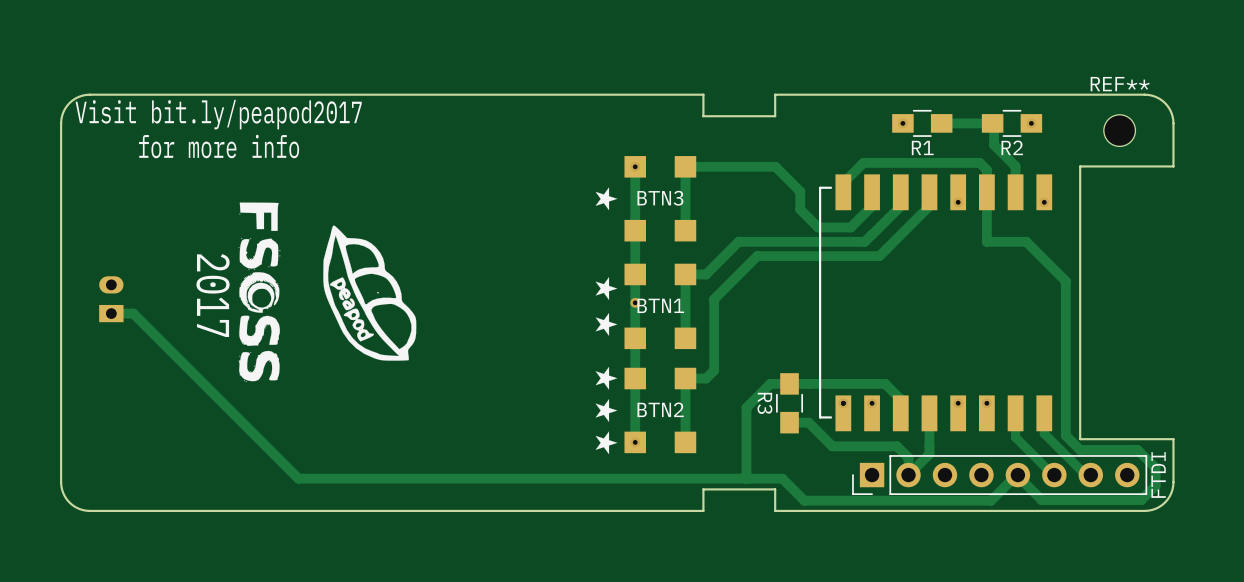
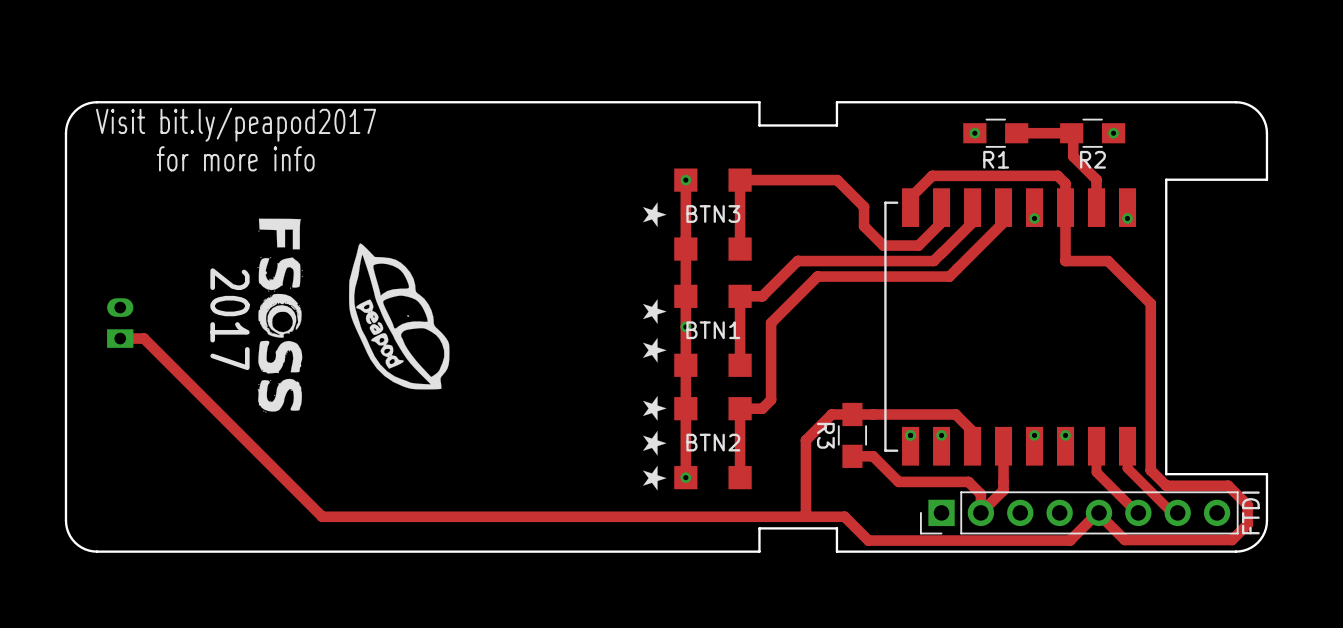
REF**: (1119, 130) -> none

